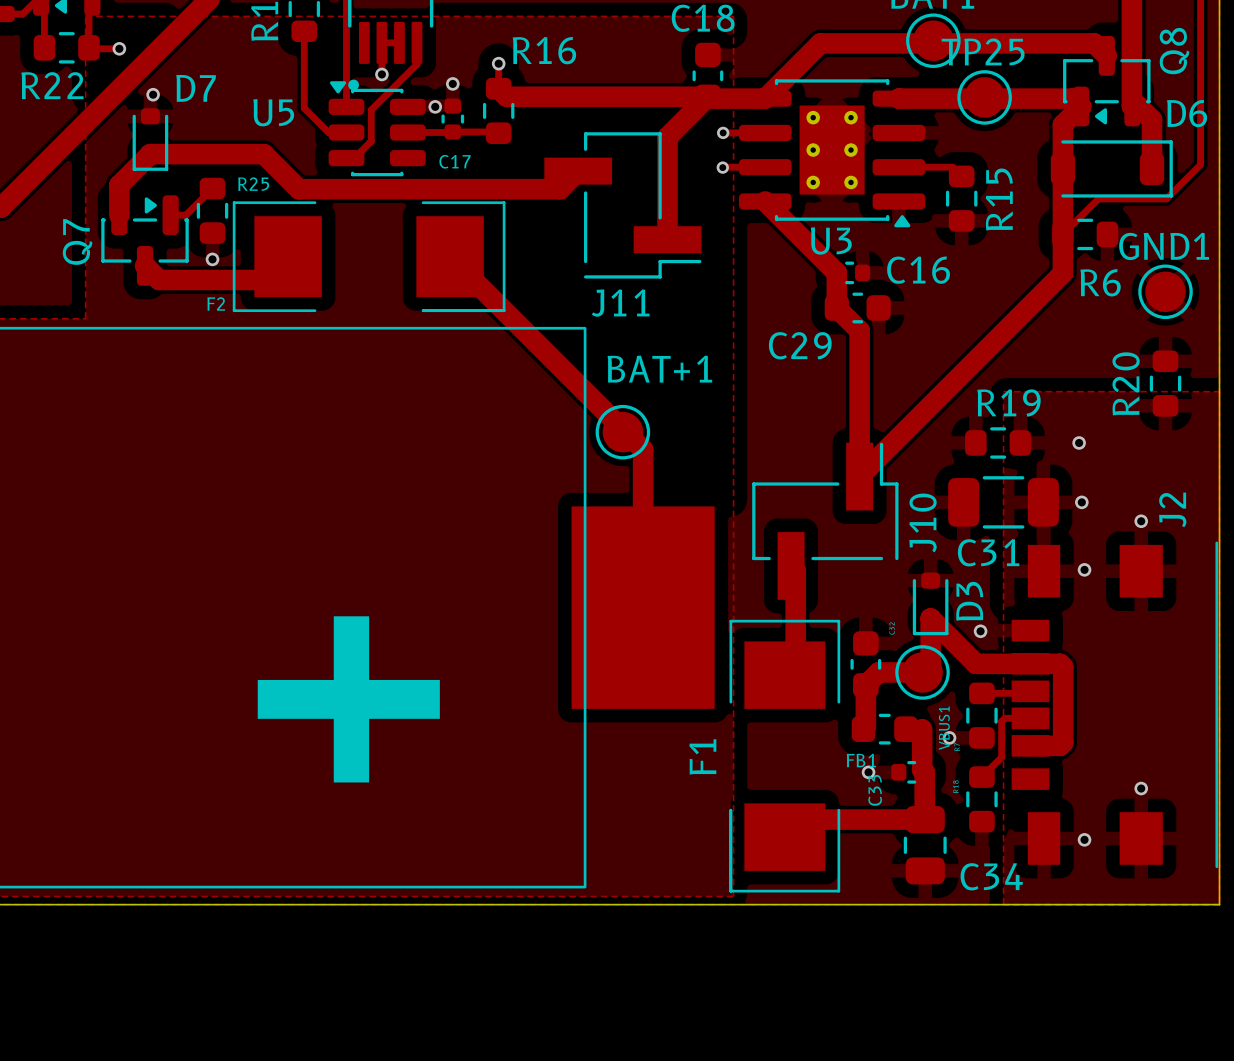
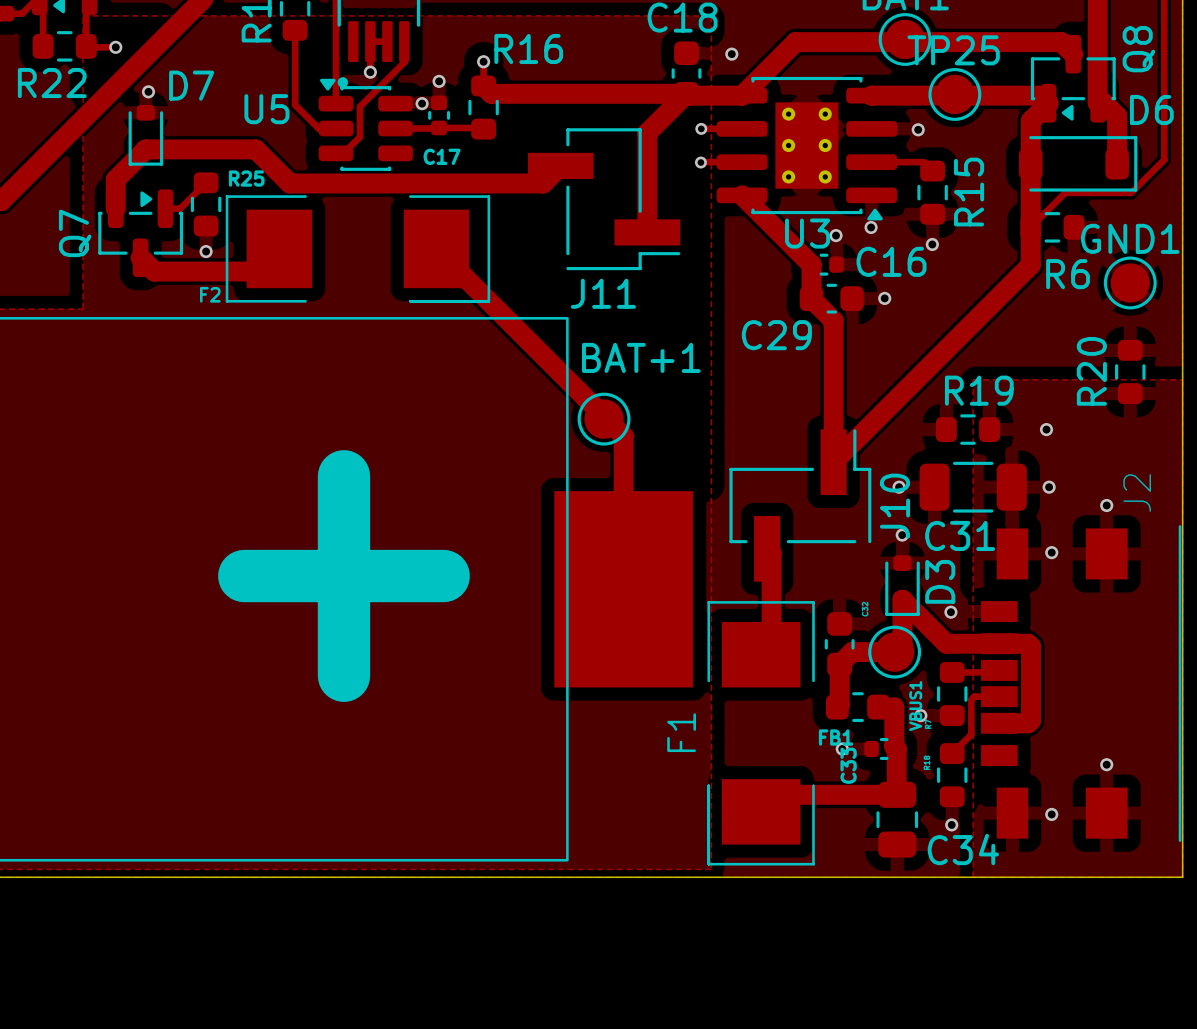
via: none -> (731, 54)
via: none -> (918, 129)
via: none -> (871, 227)
via: none -> (836, 235)
via: none -> (932, 244)
via: none -> (884, 298)
via: none -> (899, 487)
via: none -> (902, 535)
via: none -> (951, 824)

